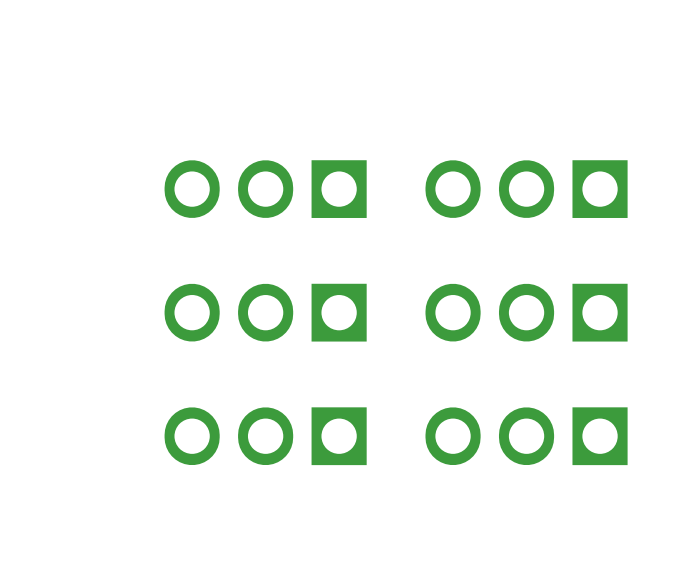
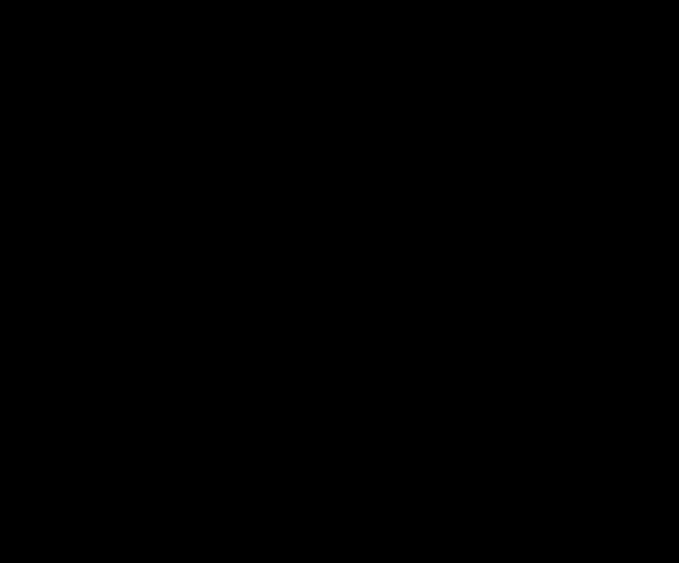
part: (265, 189) -> none
part: (526, 189) -> none
part: (265, 312) -> none
part: (526, 312) -> none
part: (265, 436) -> none
part: (526, 436) -> none

